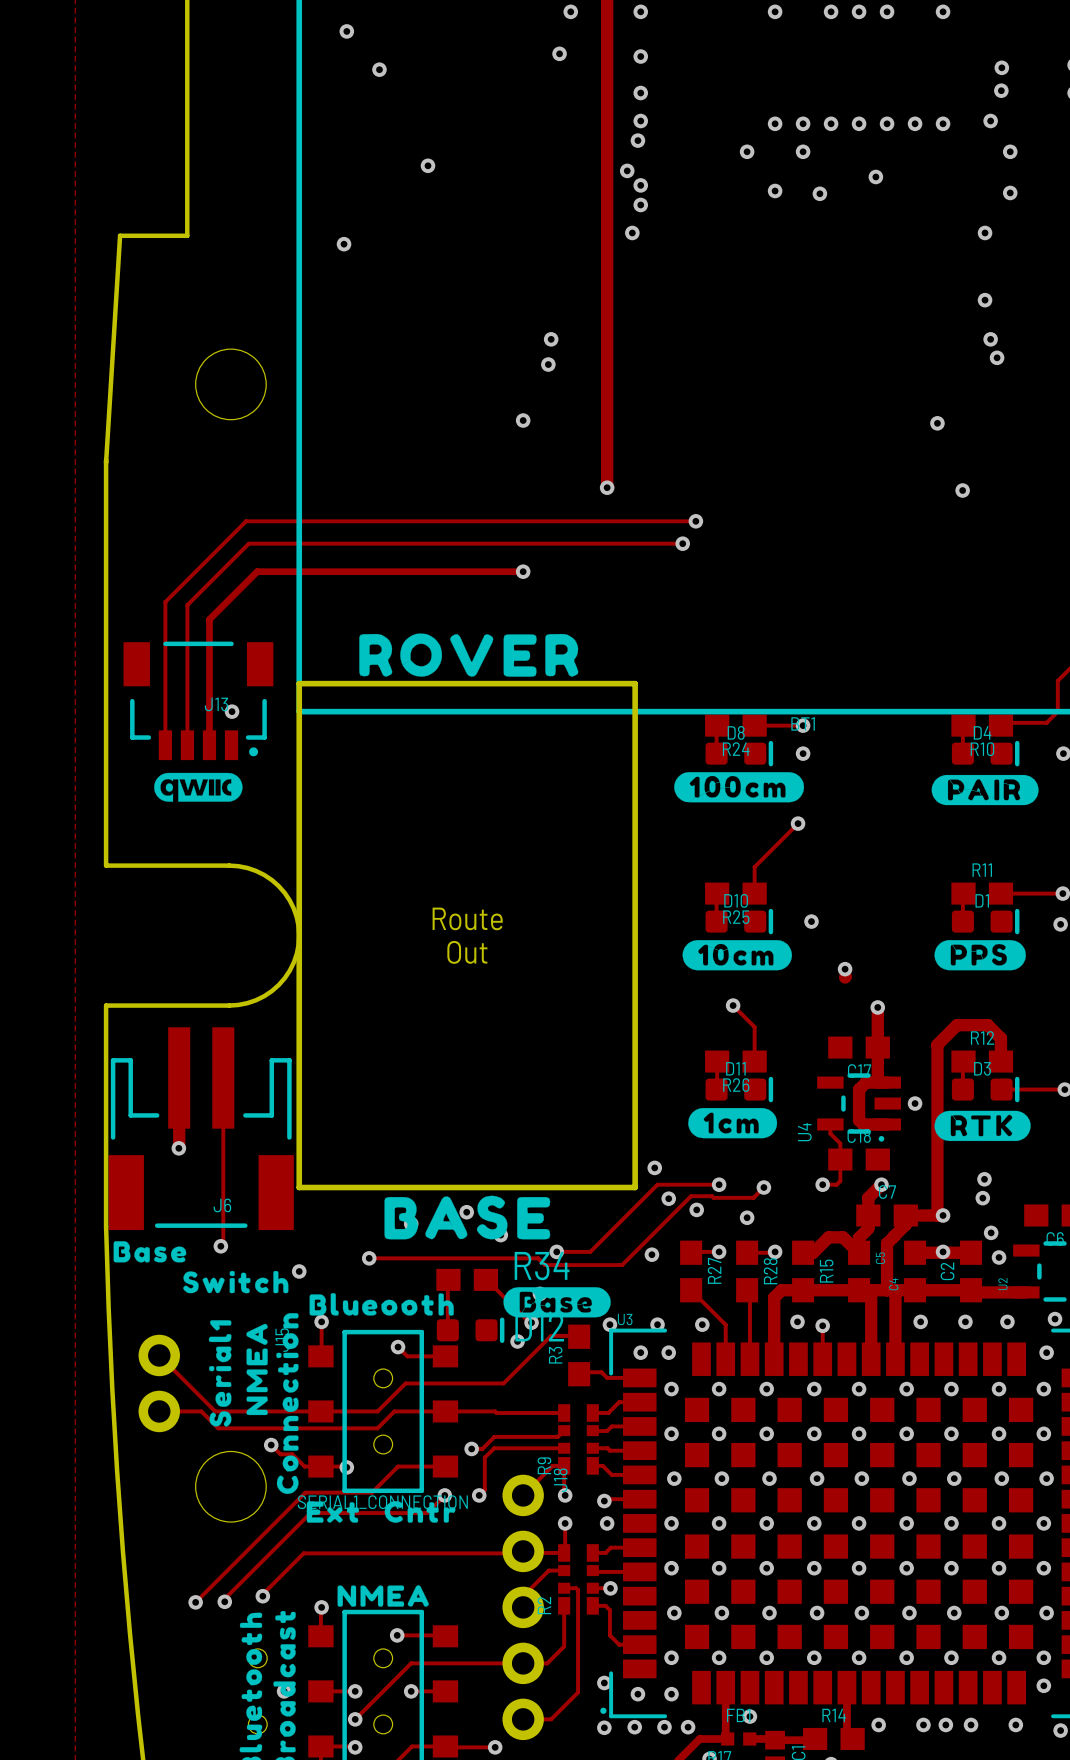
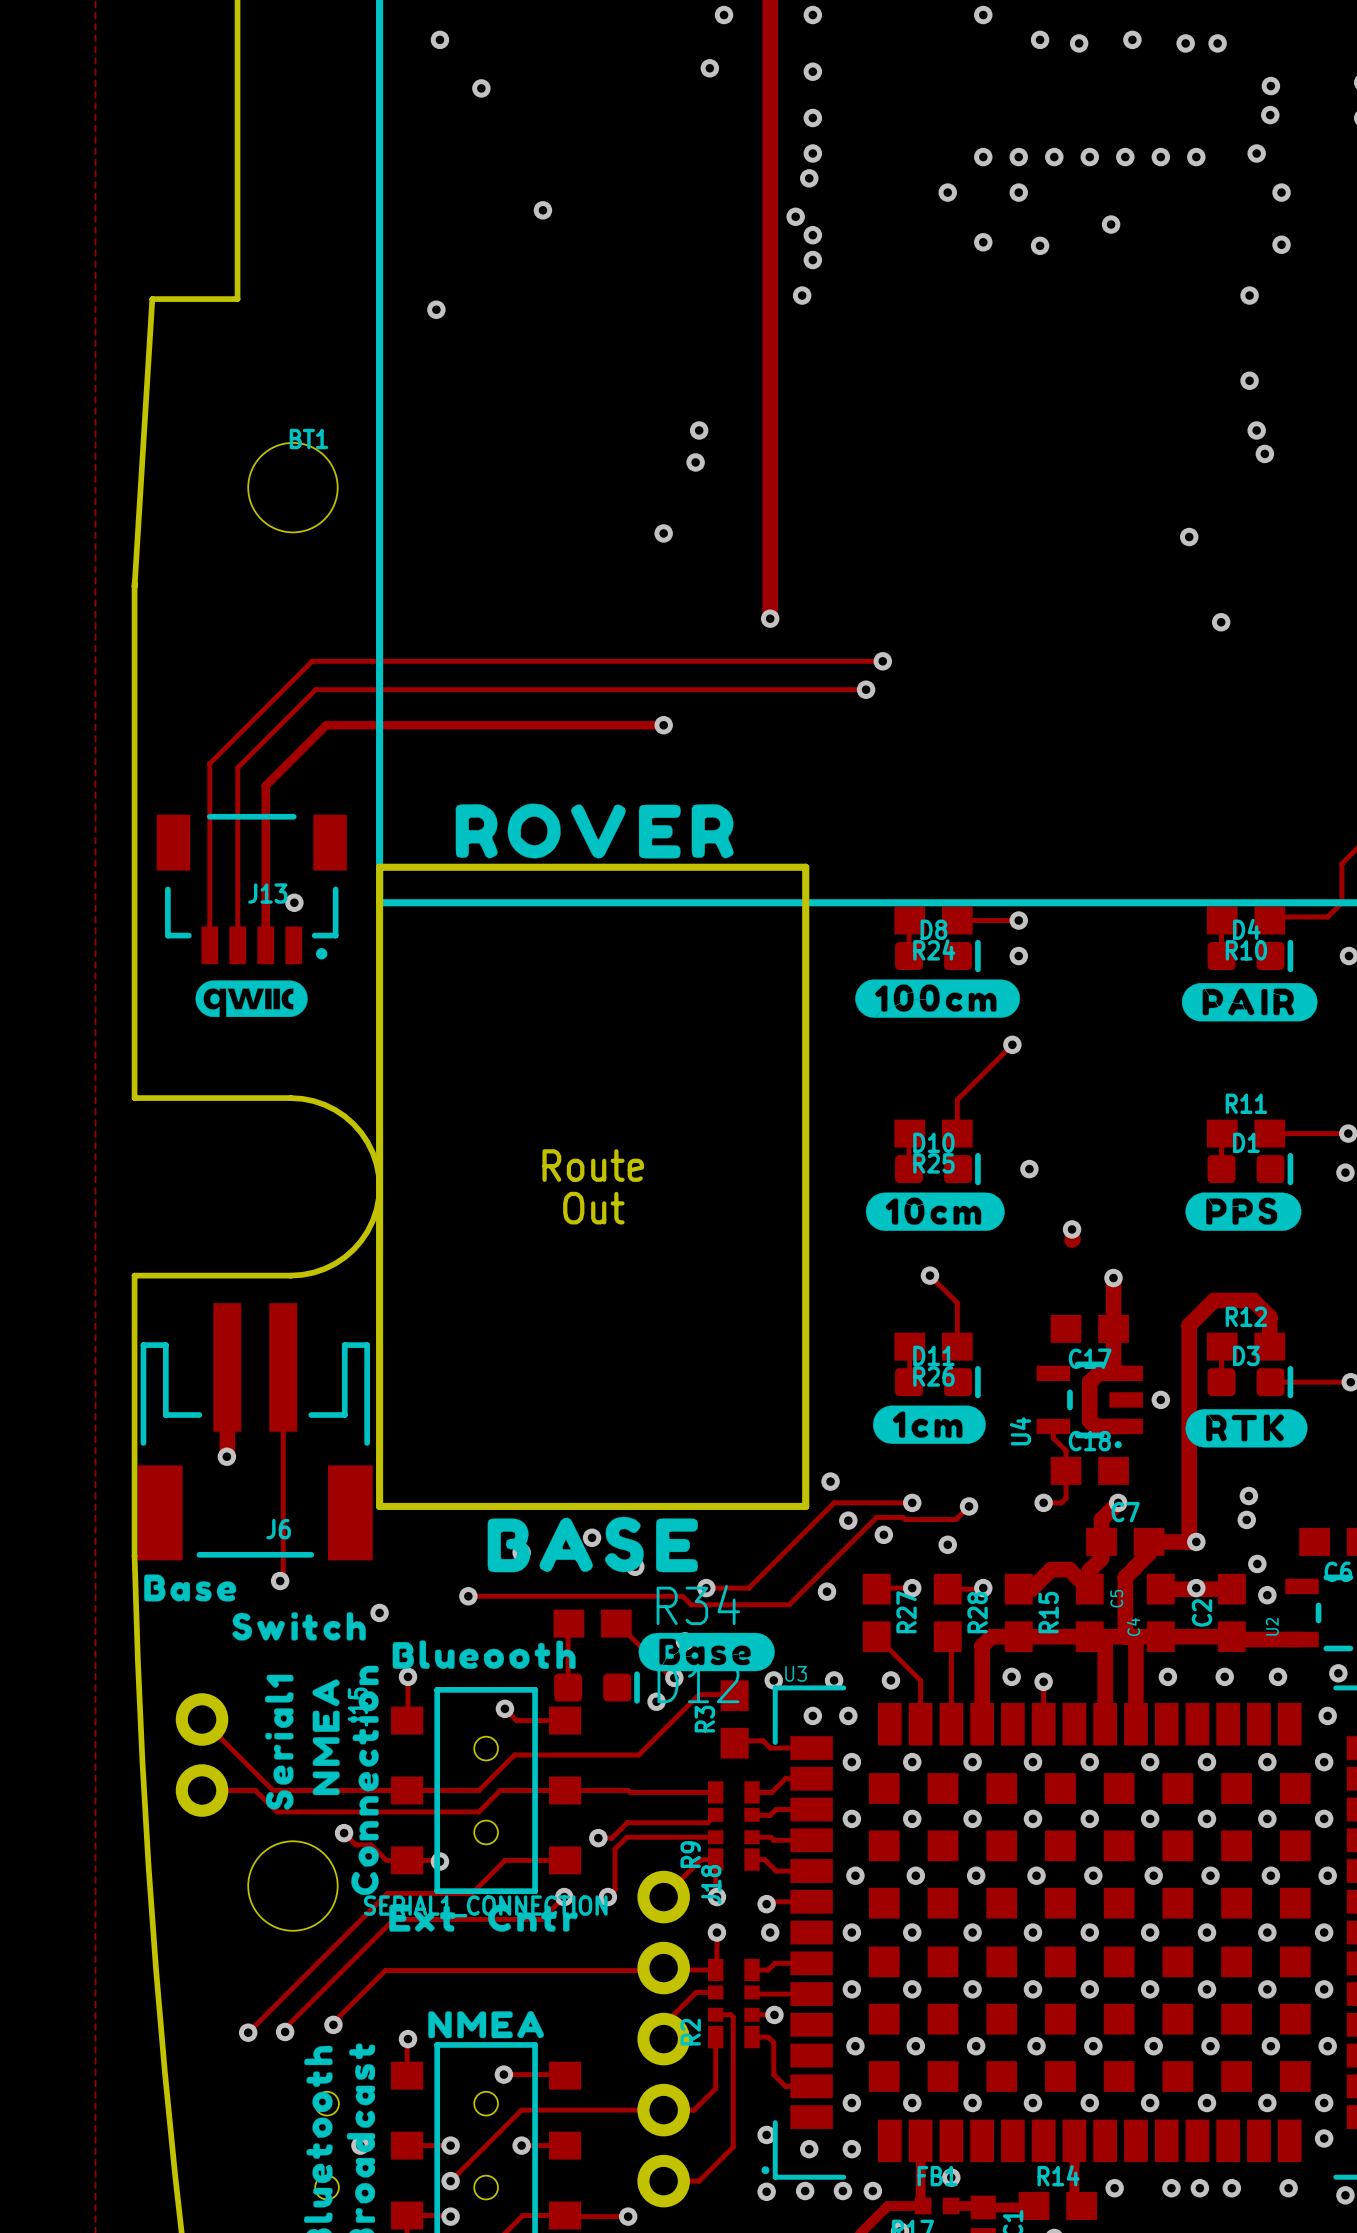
via: (831, 11) -> none
via: (859, 11) -> none
via: (887, 11) -> none
via: (943, 11) -> none
via: none -> (1040, 39)
via: none -> (1132, 39)
via: none -> (1079, 43)
via: none -> (1185, 43)
via: none -> (1217, 43)
BT1 position: (803, 723) -> (308, 439)

